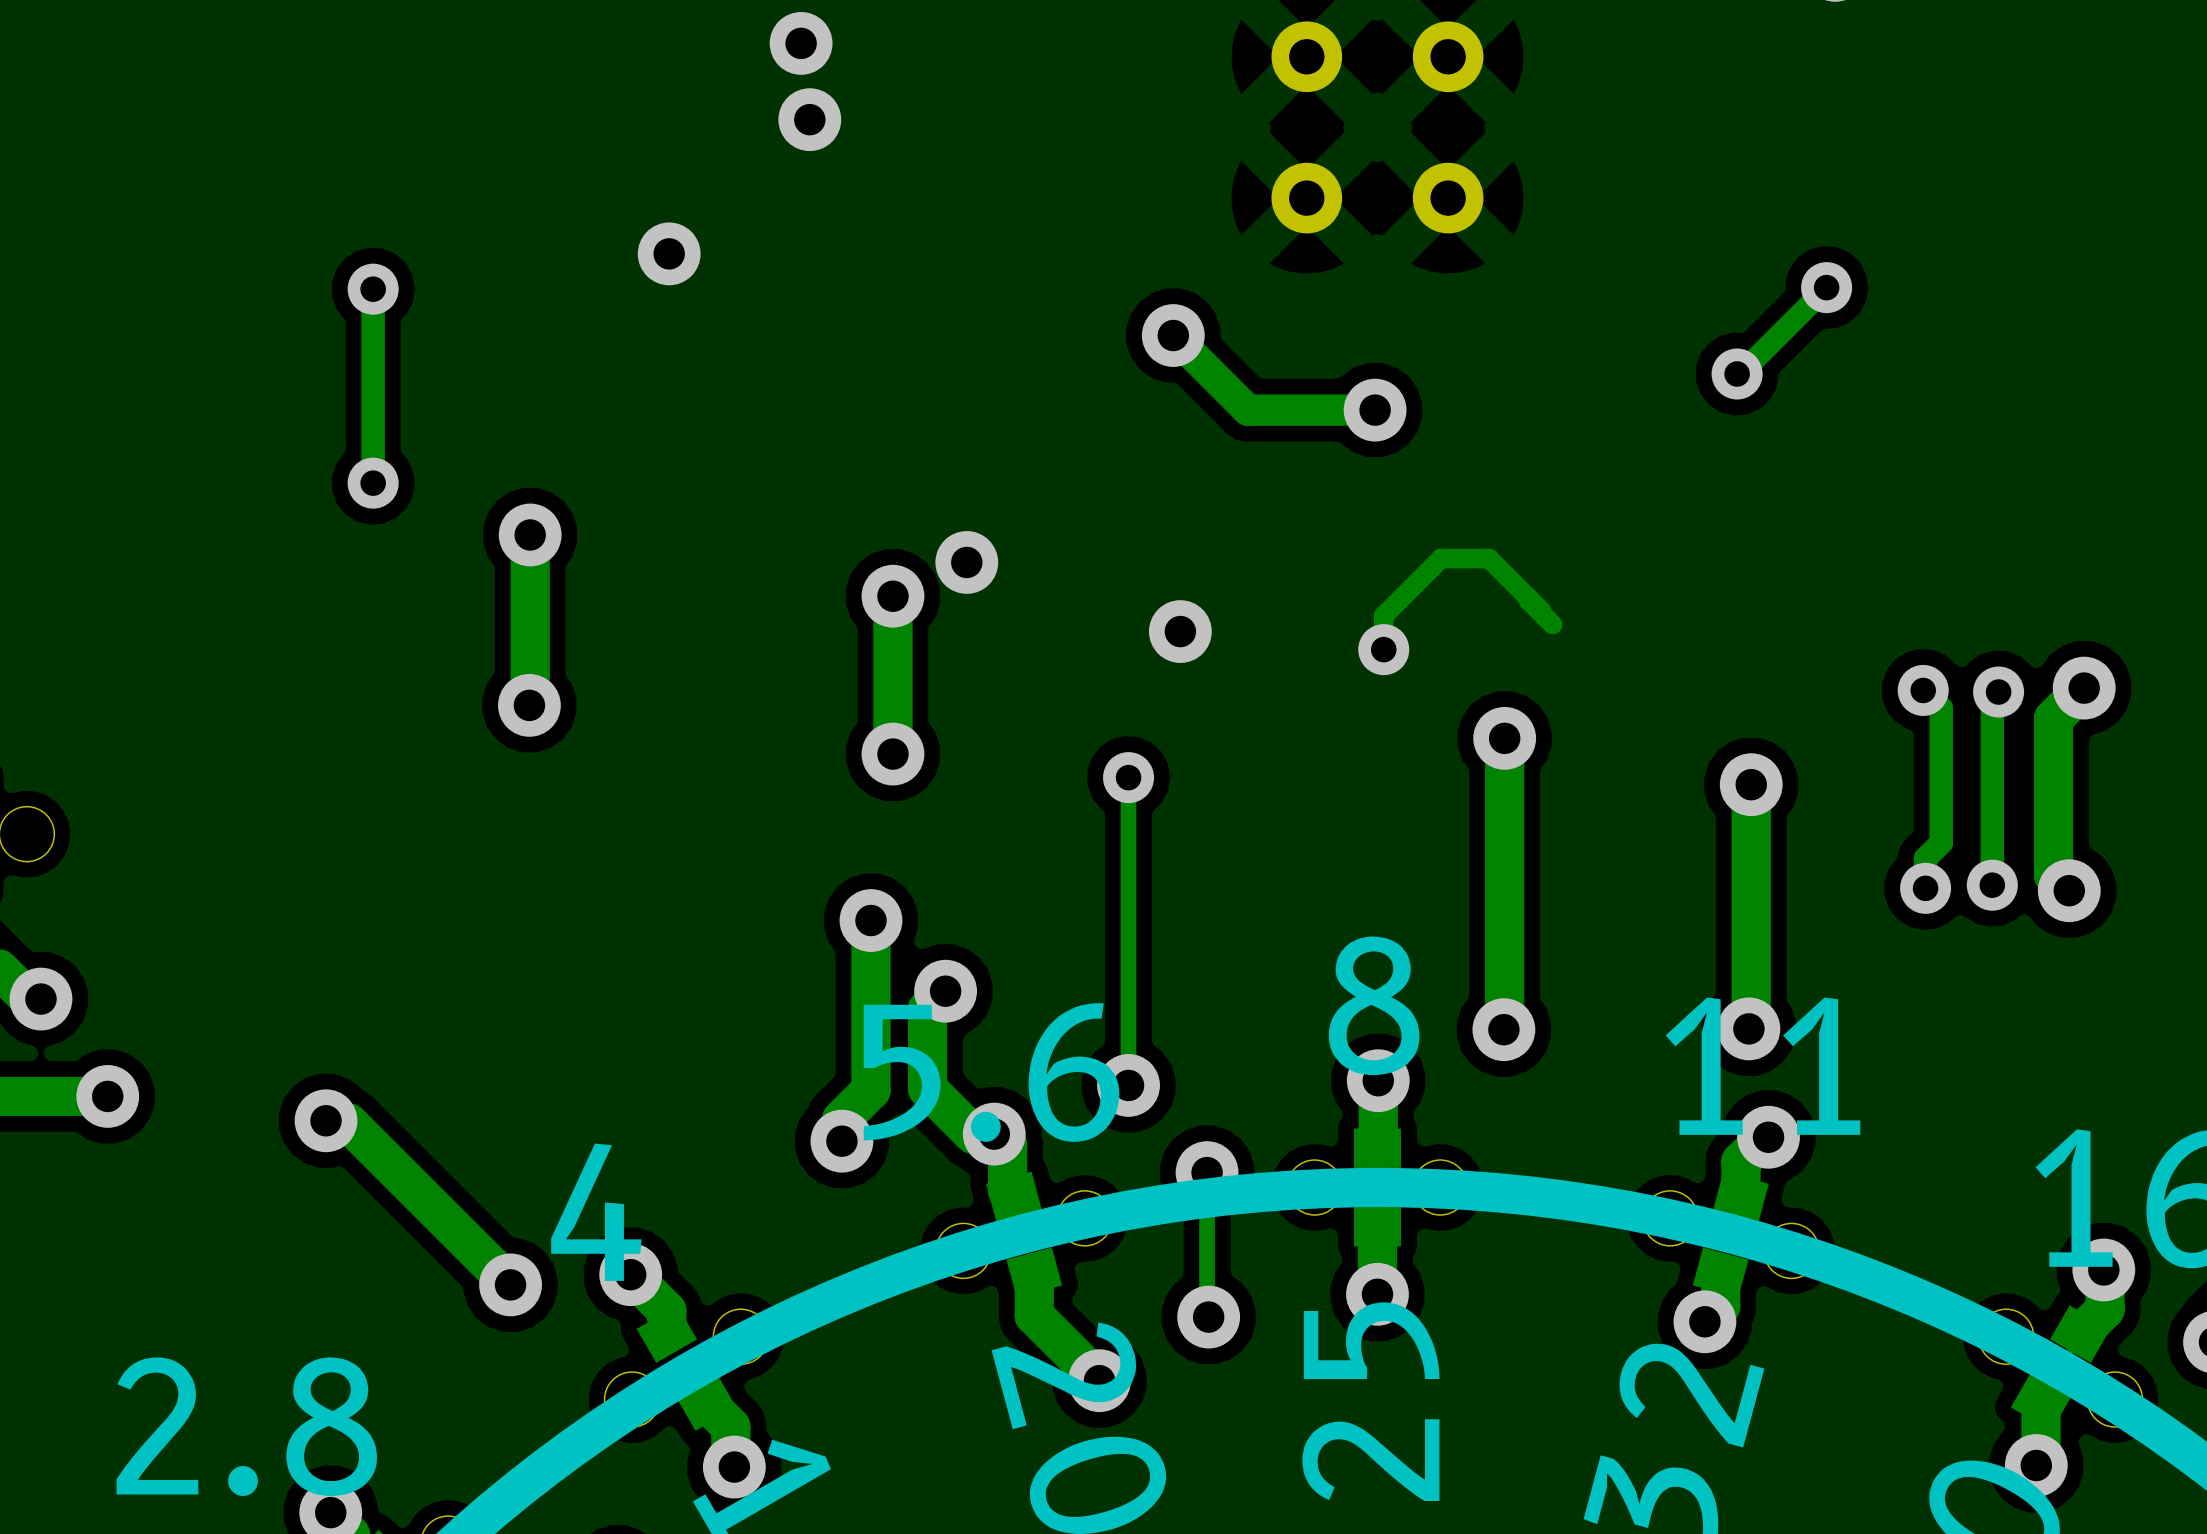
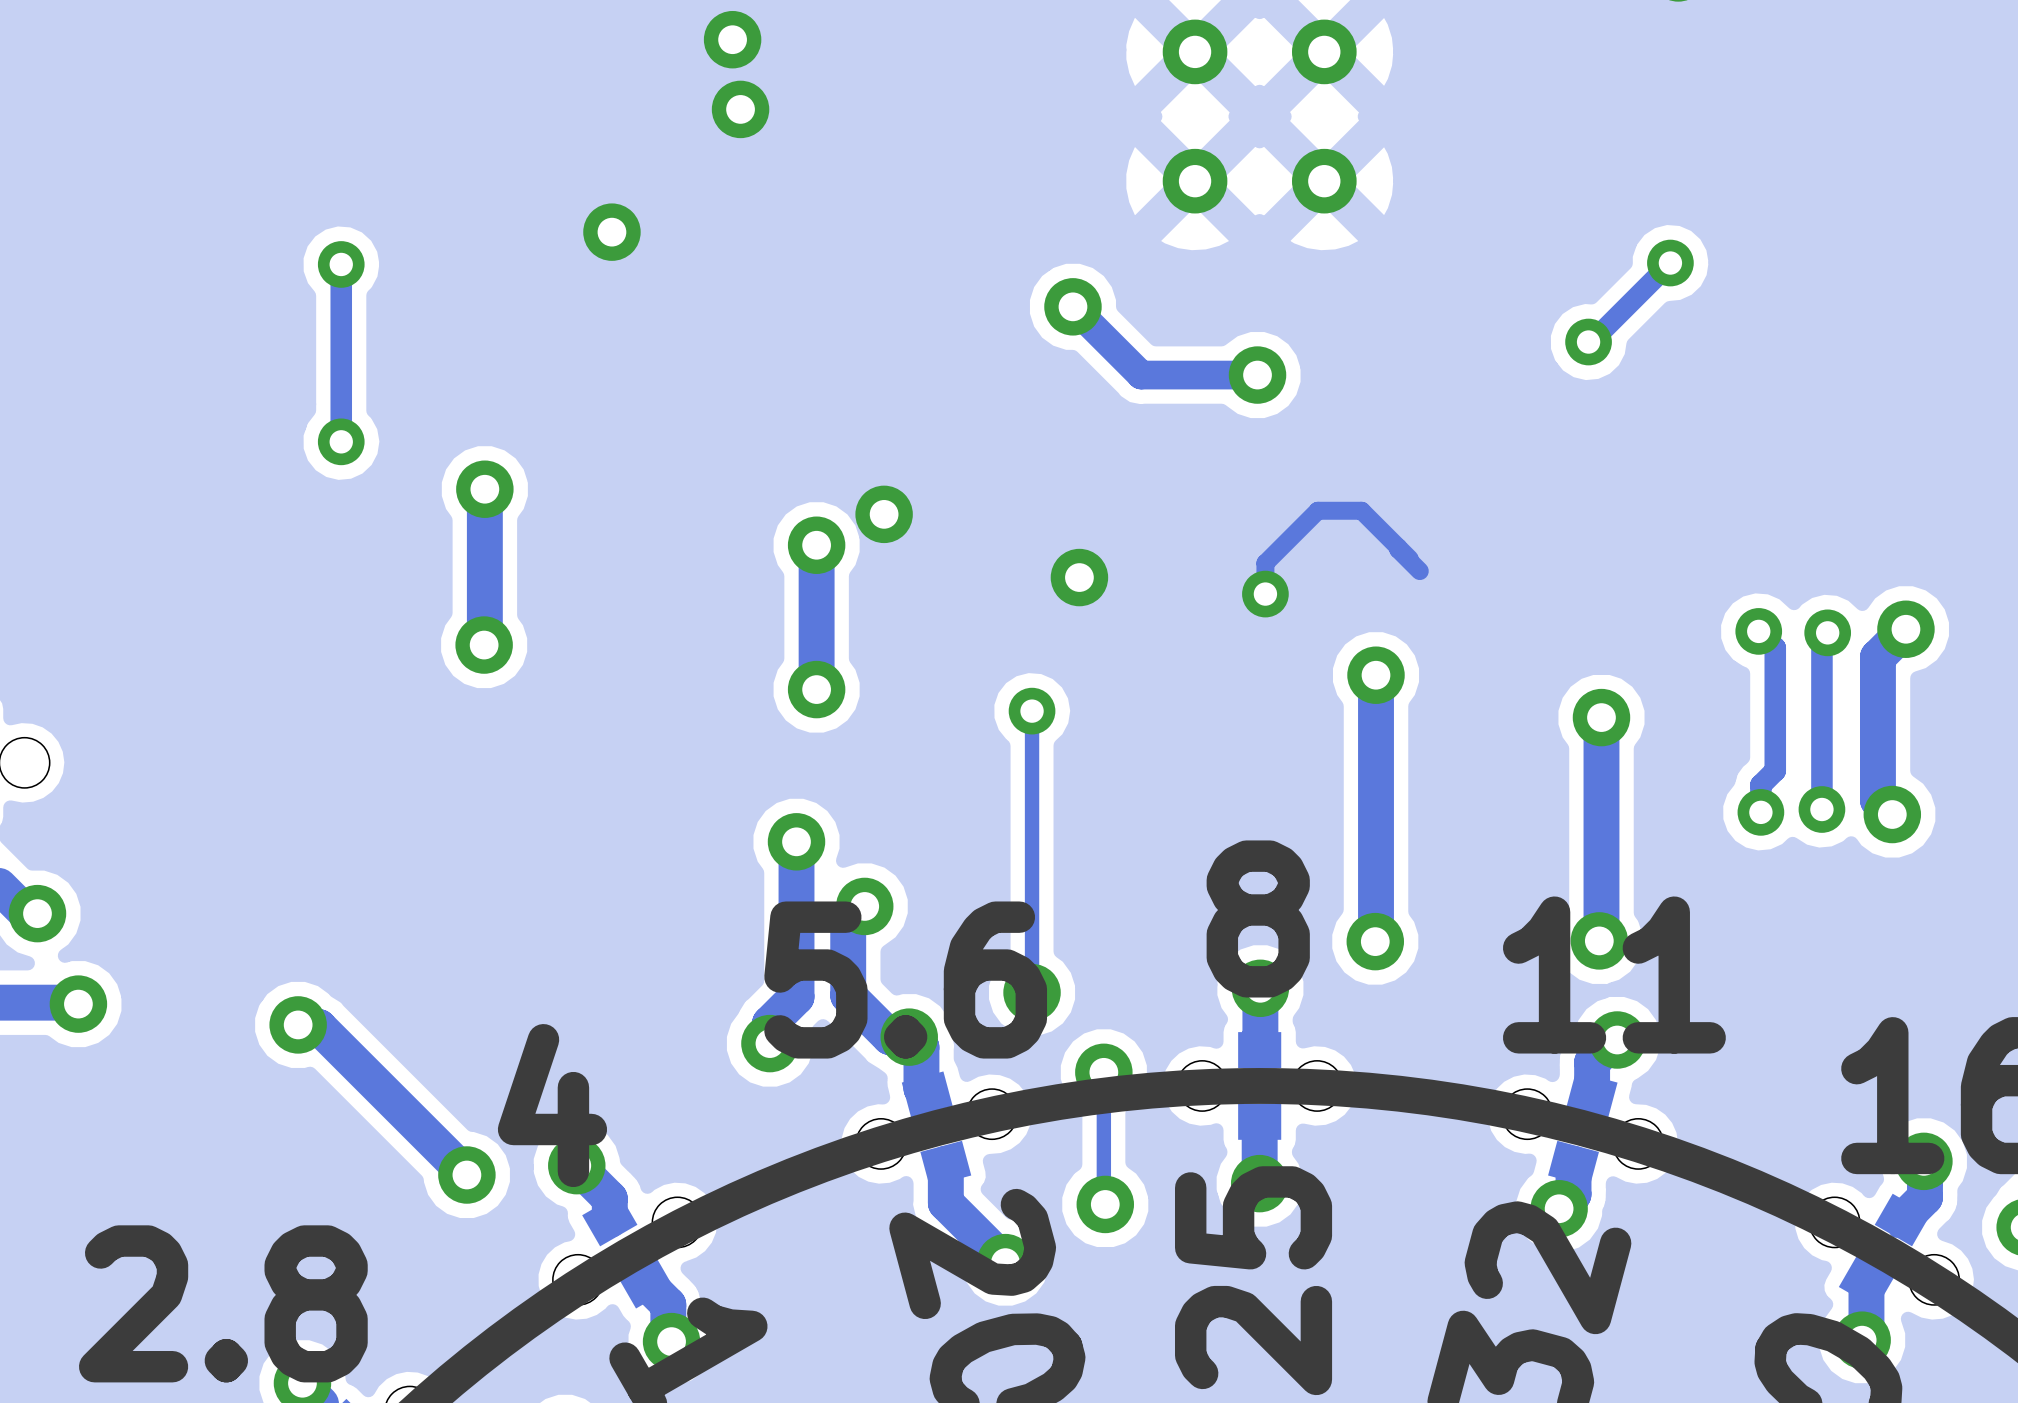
via position: (107, 1096) -> (78, 1004)

